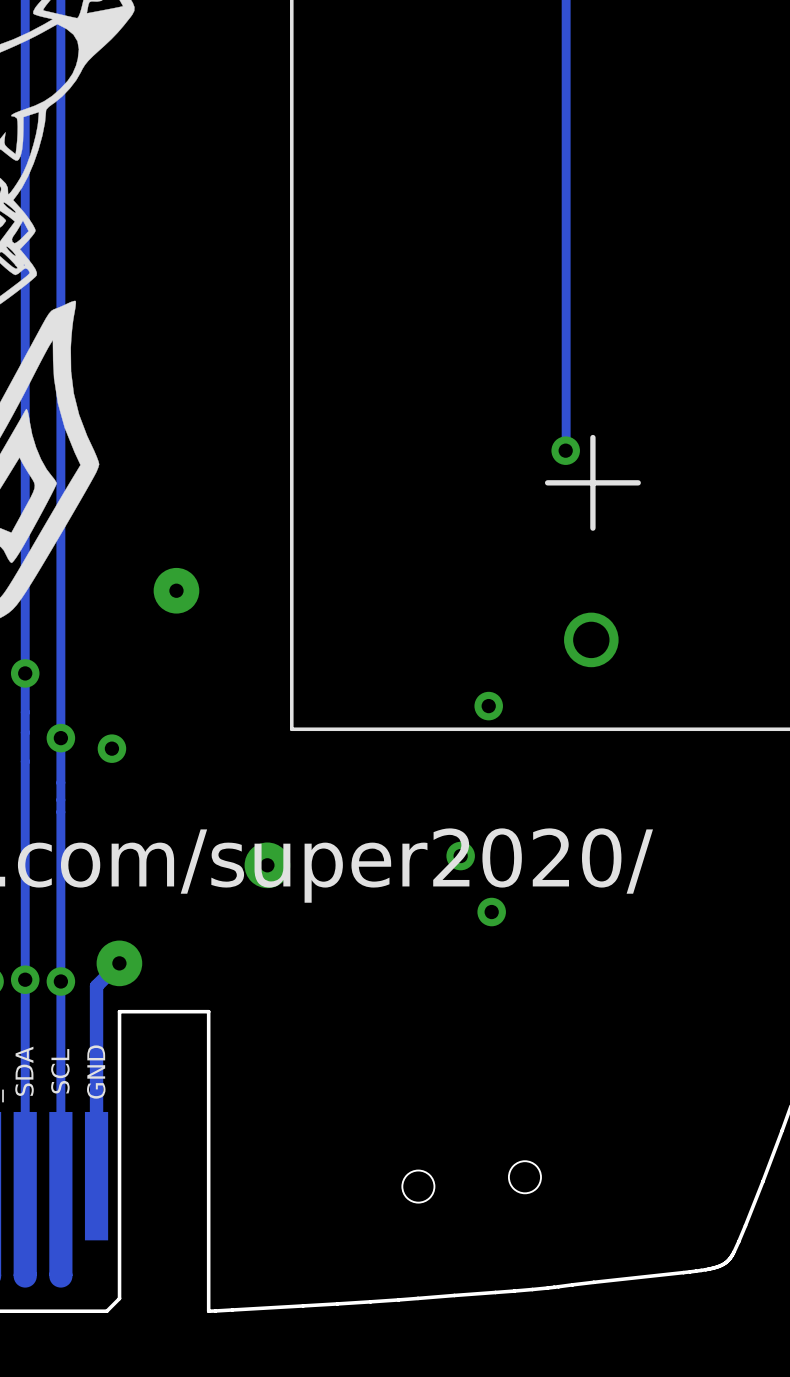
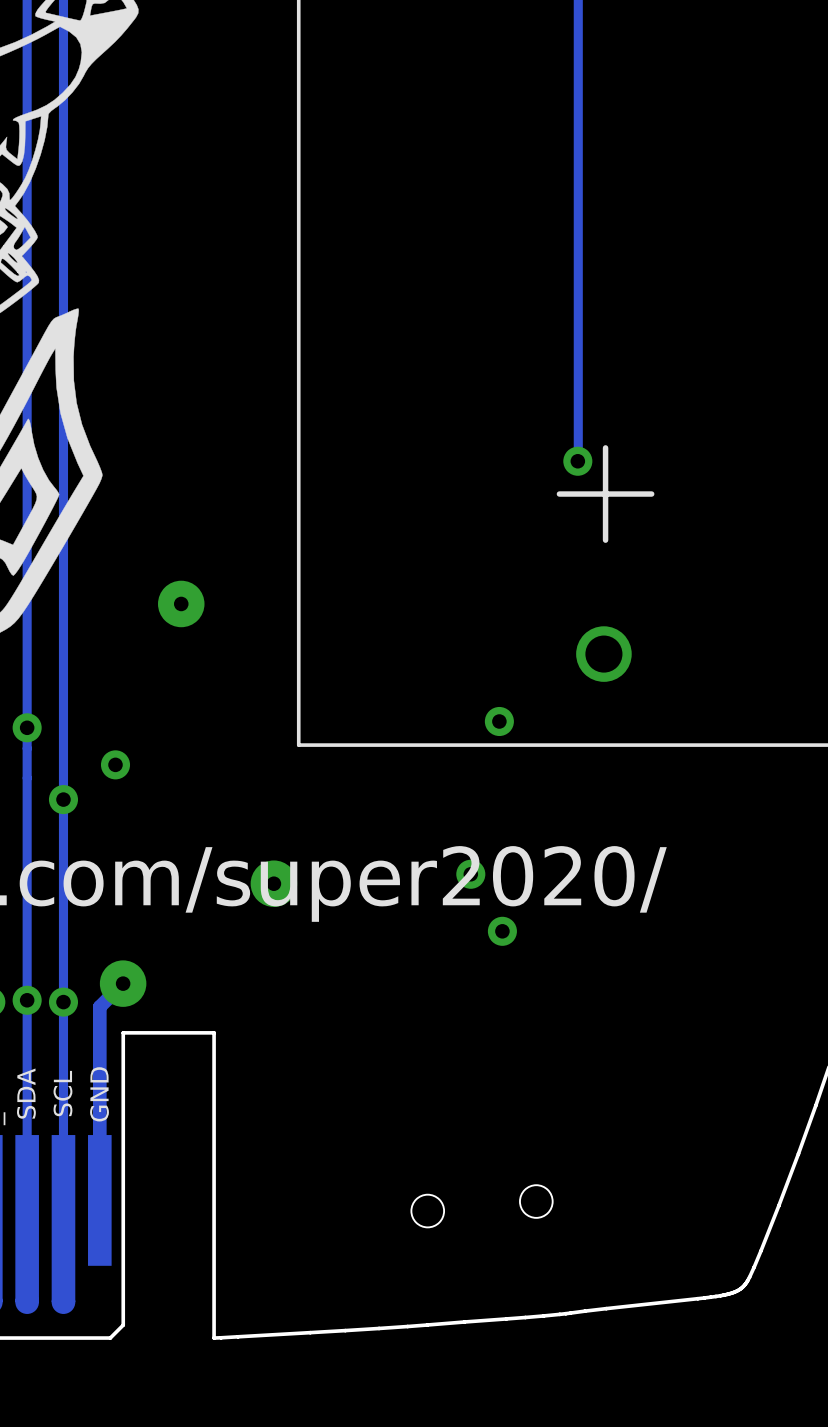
via: (25, 673) -> none
via: none -> (27, 727)
via: (60, 738) -> none
via: none -> (63, 799)

